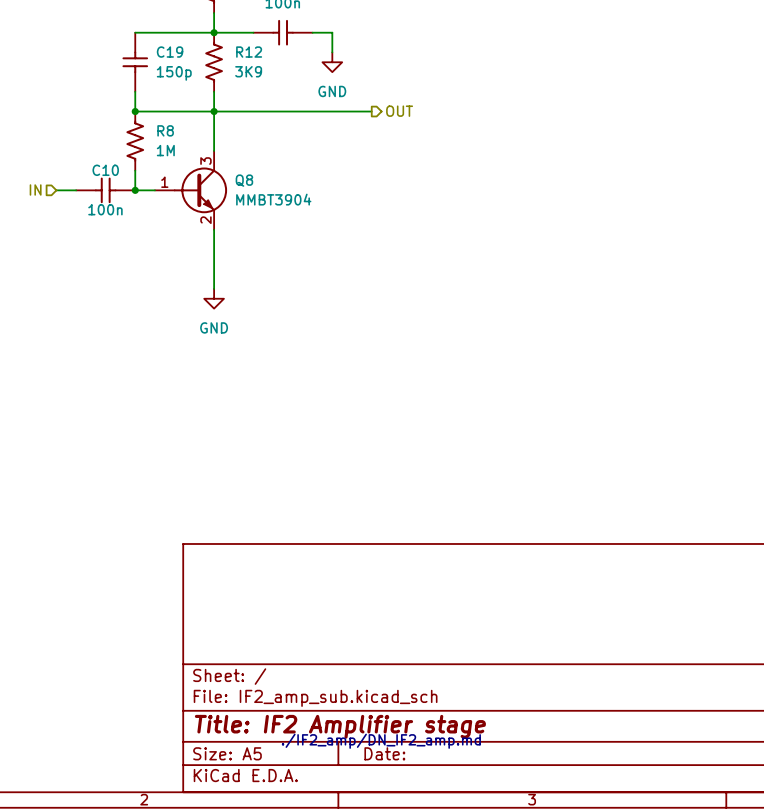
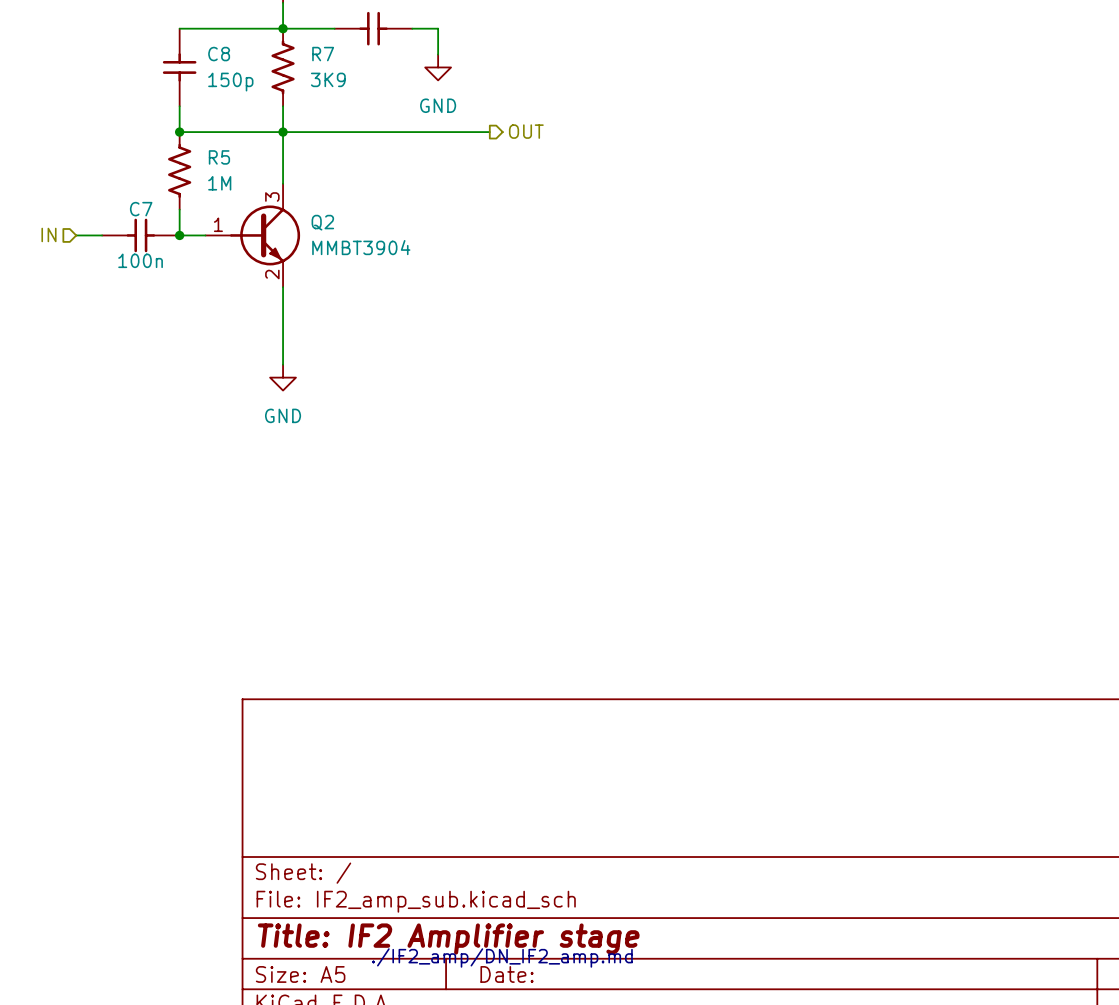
C19 name: C19 (170, 52) -> C8 (219, 54)
R12 name: R12 (249, 52) -> R7 (323, 54)
R8 name: R8 (165, 130) -> R5 (219, 157)
C10 name: C10 (105, 170) -> C7 (141, 209)
Q8 name: Q8 (244, 180) -> Q2 (322, 222)

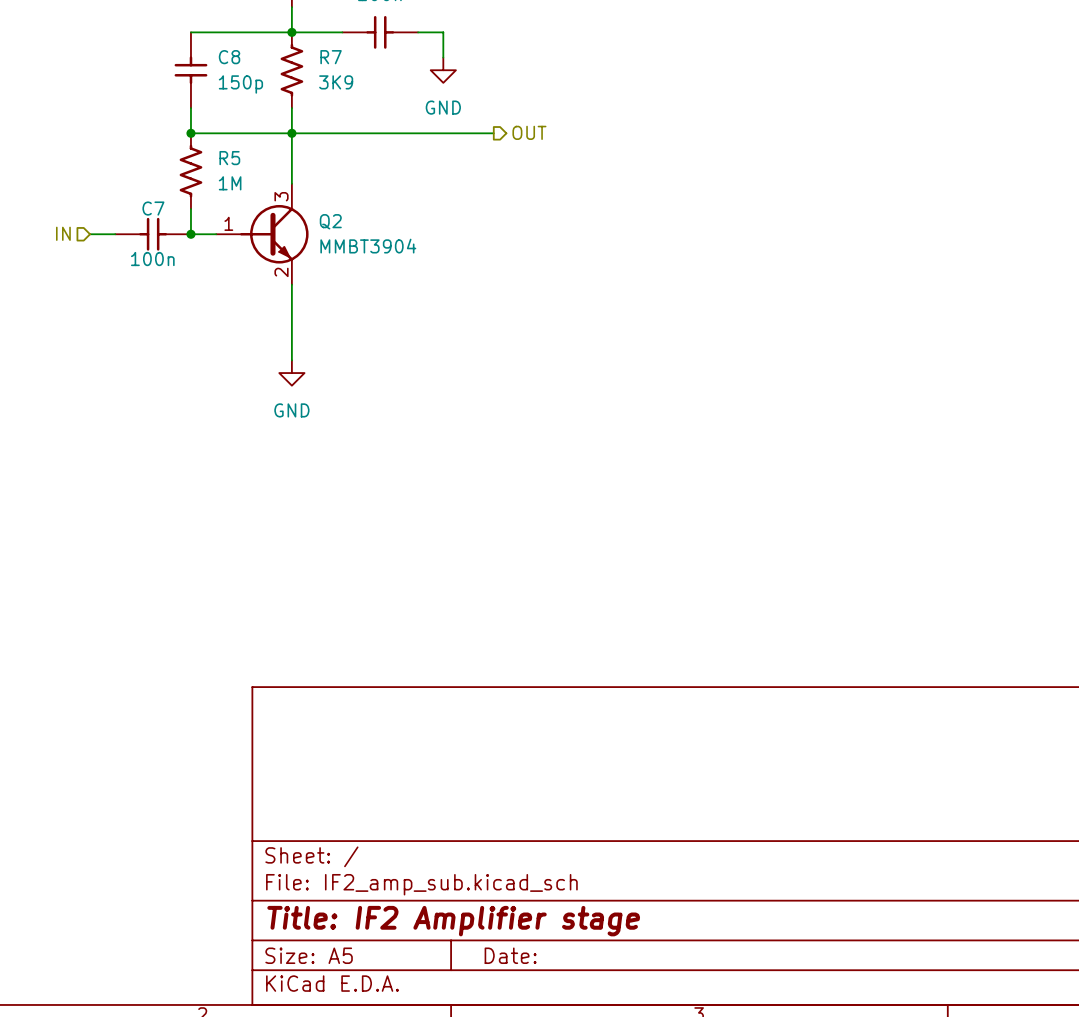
text: ./IF2_amp/DN_IF2_amp.md (502, 957) -> none

